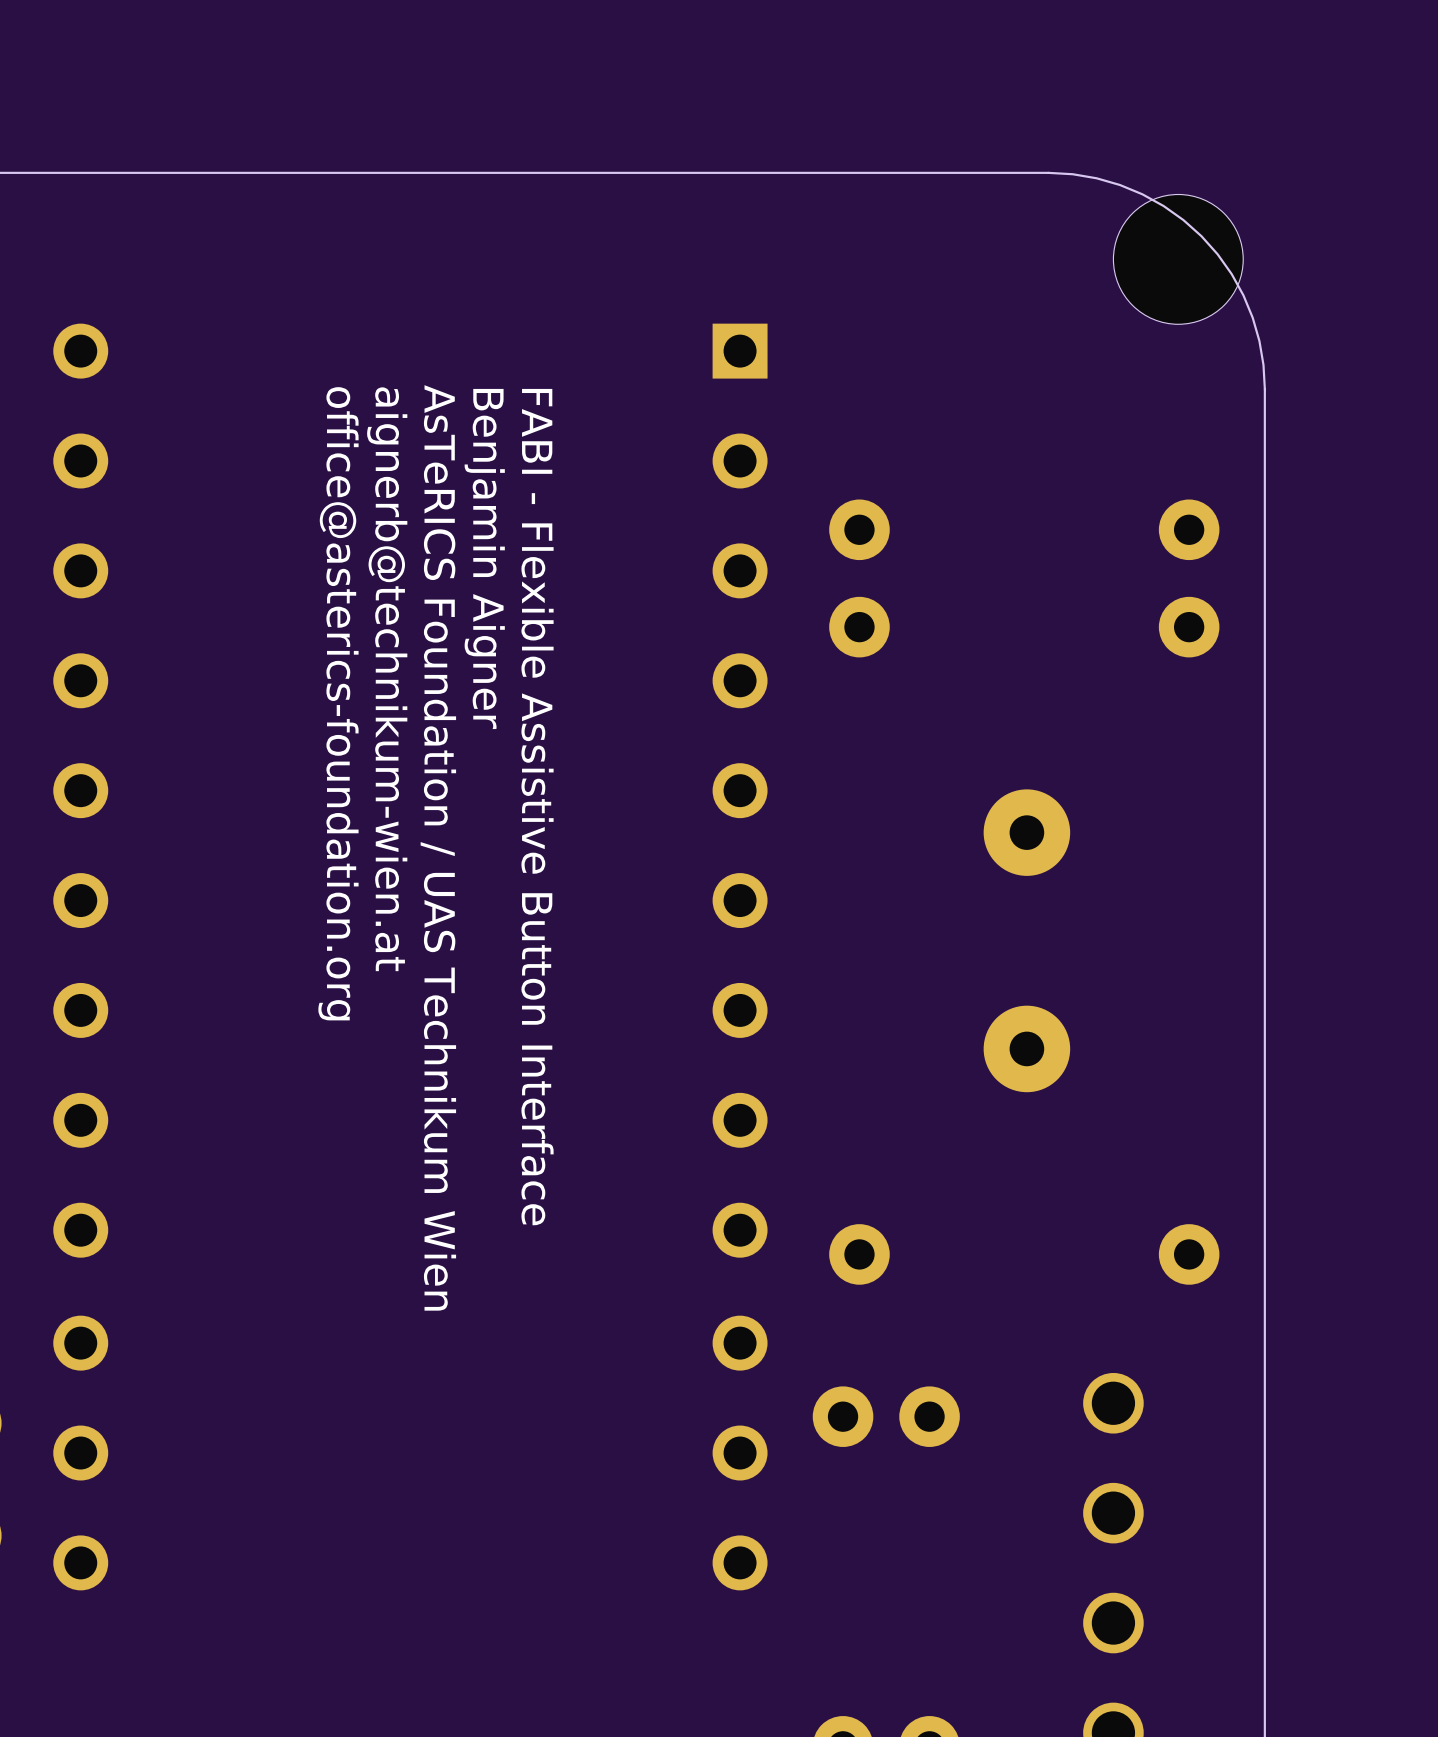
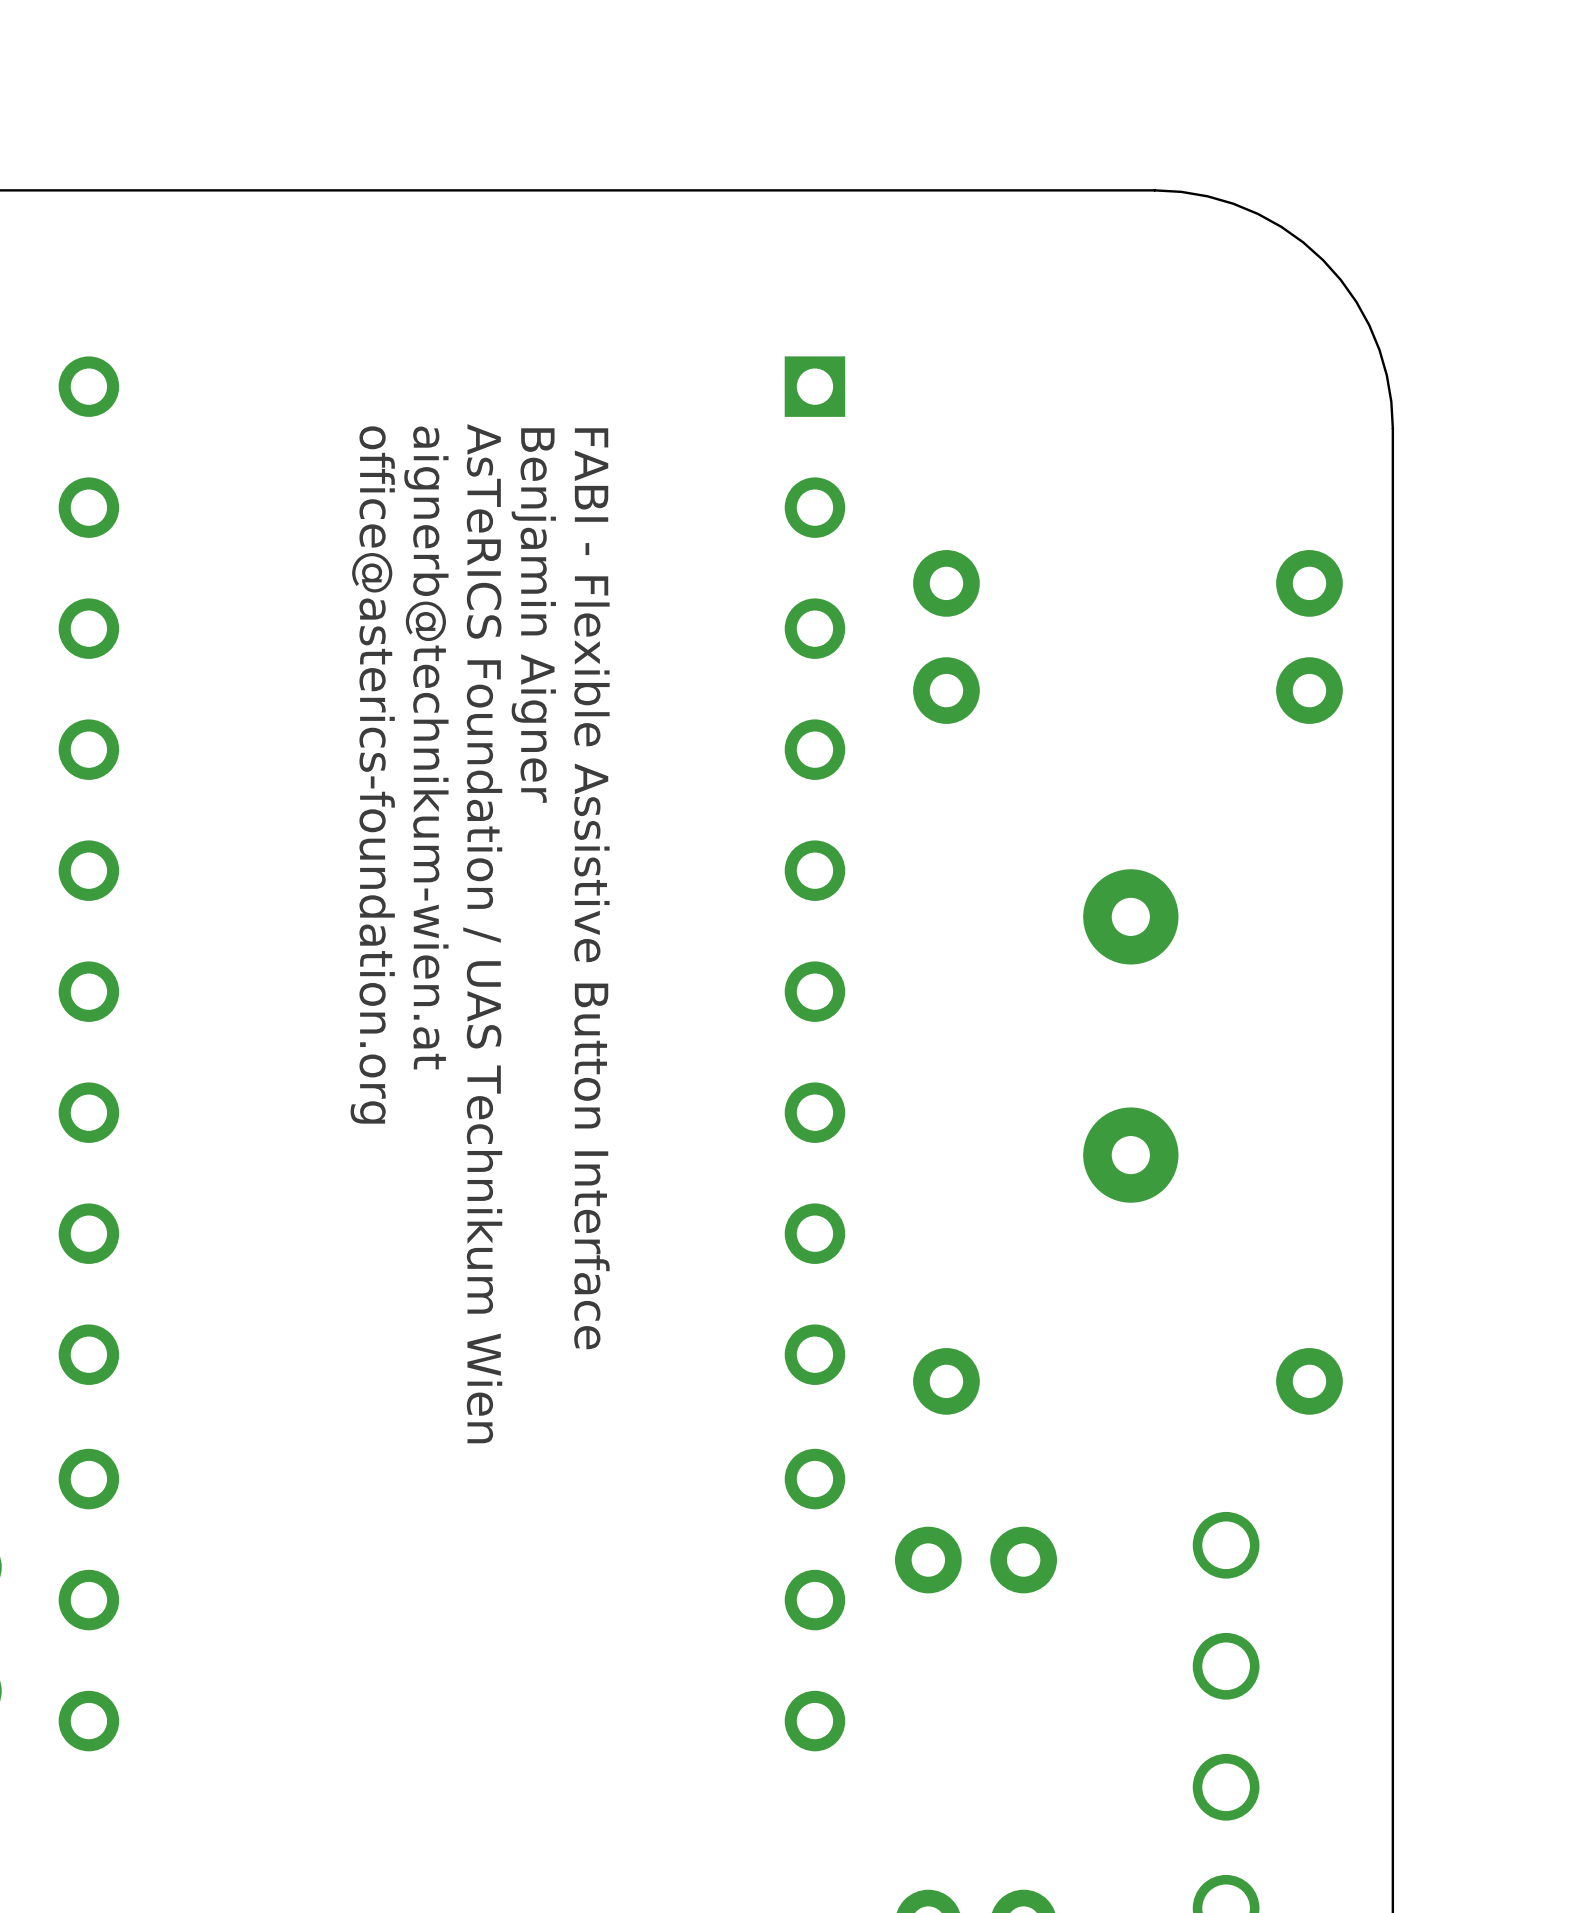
part: (1178, 259) -> none

